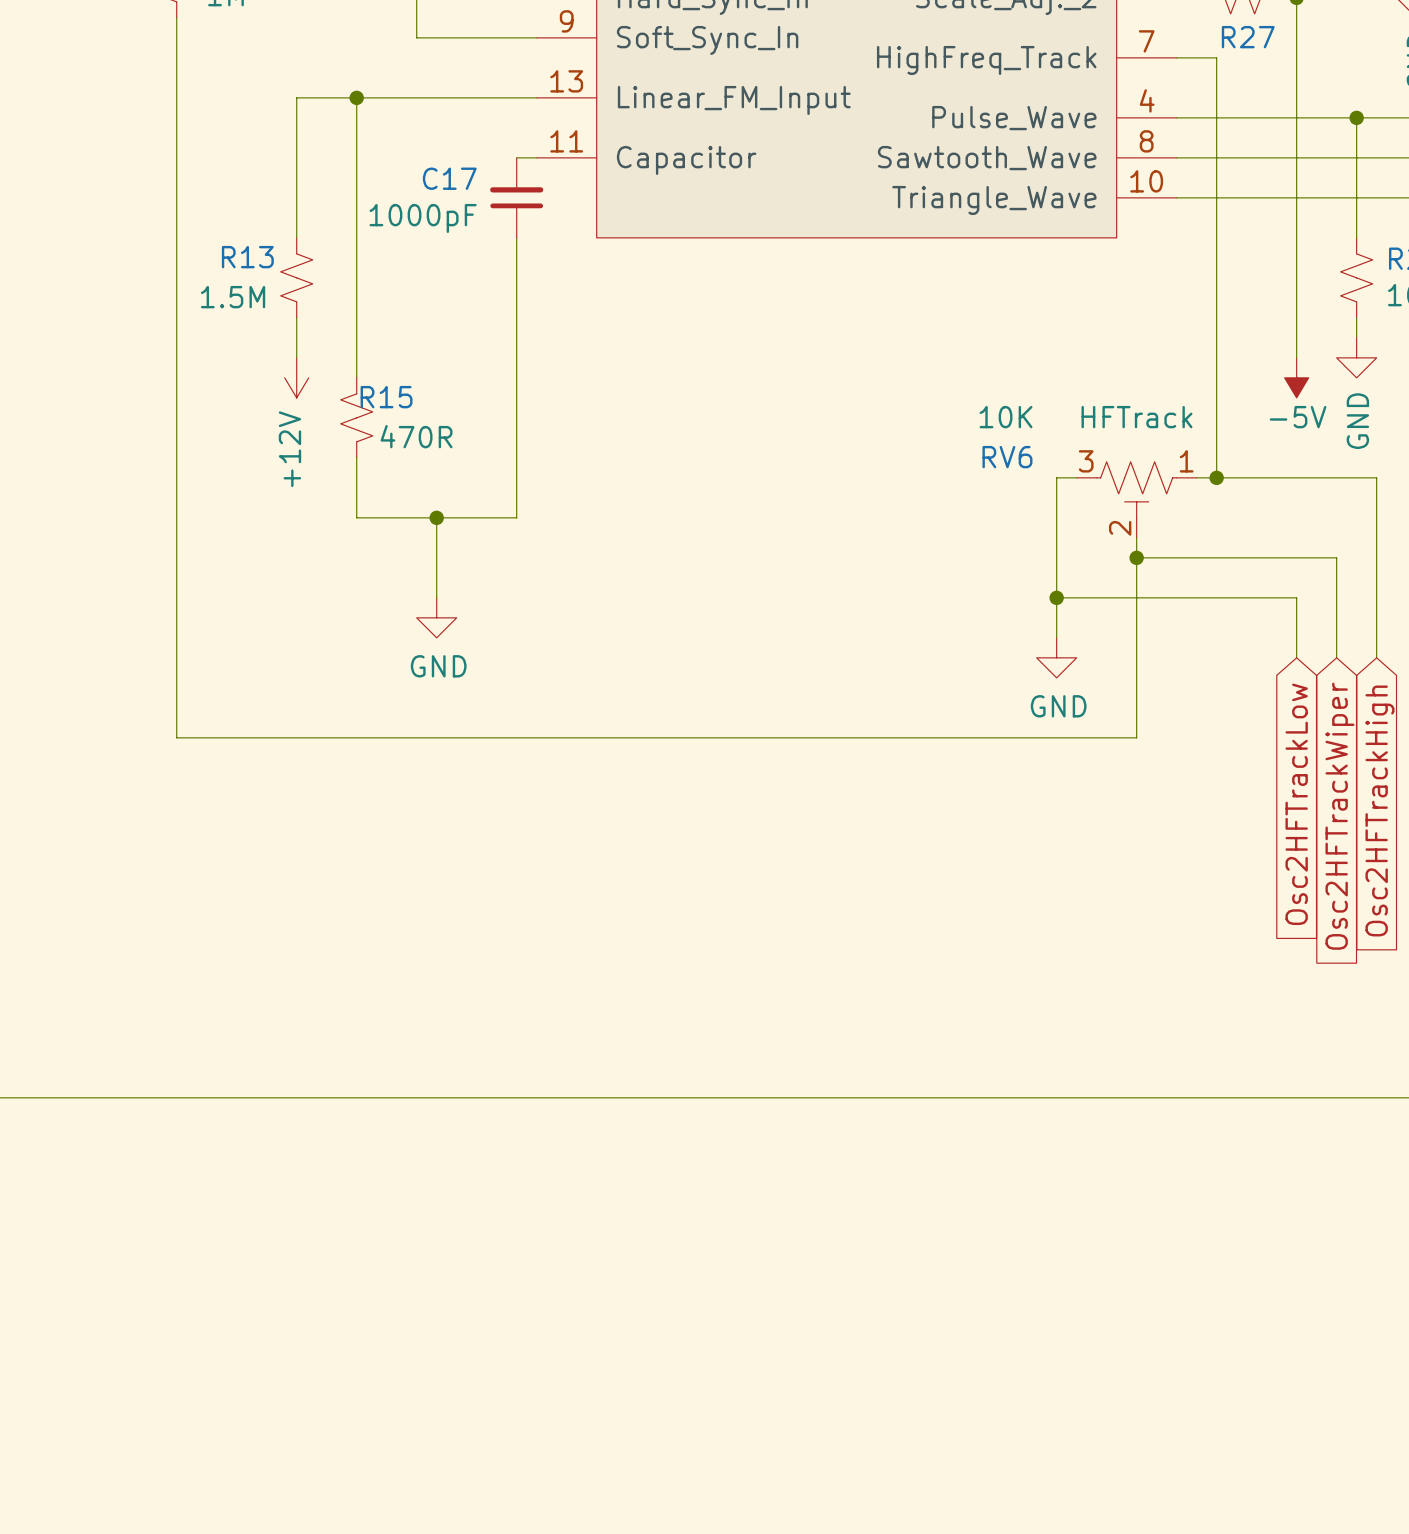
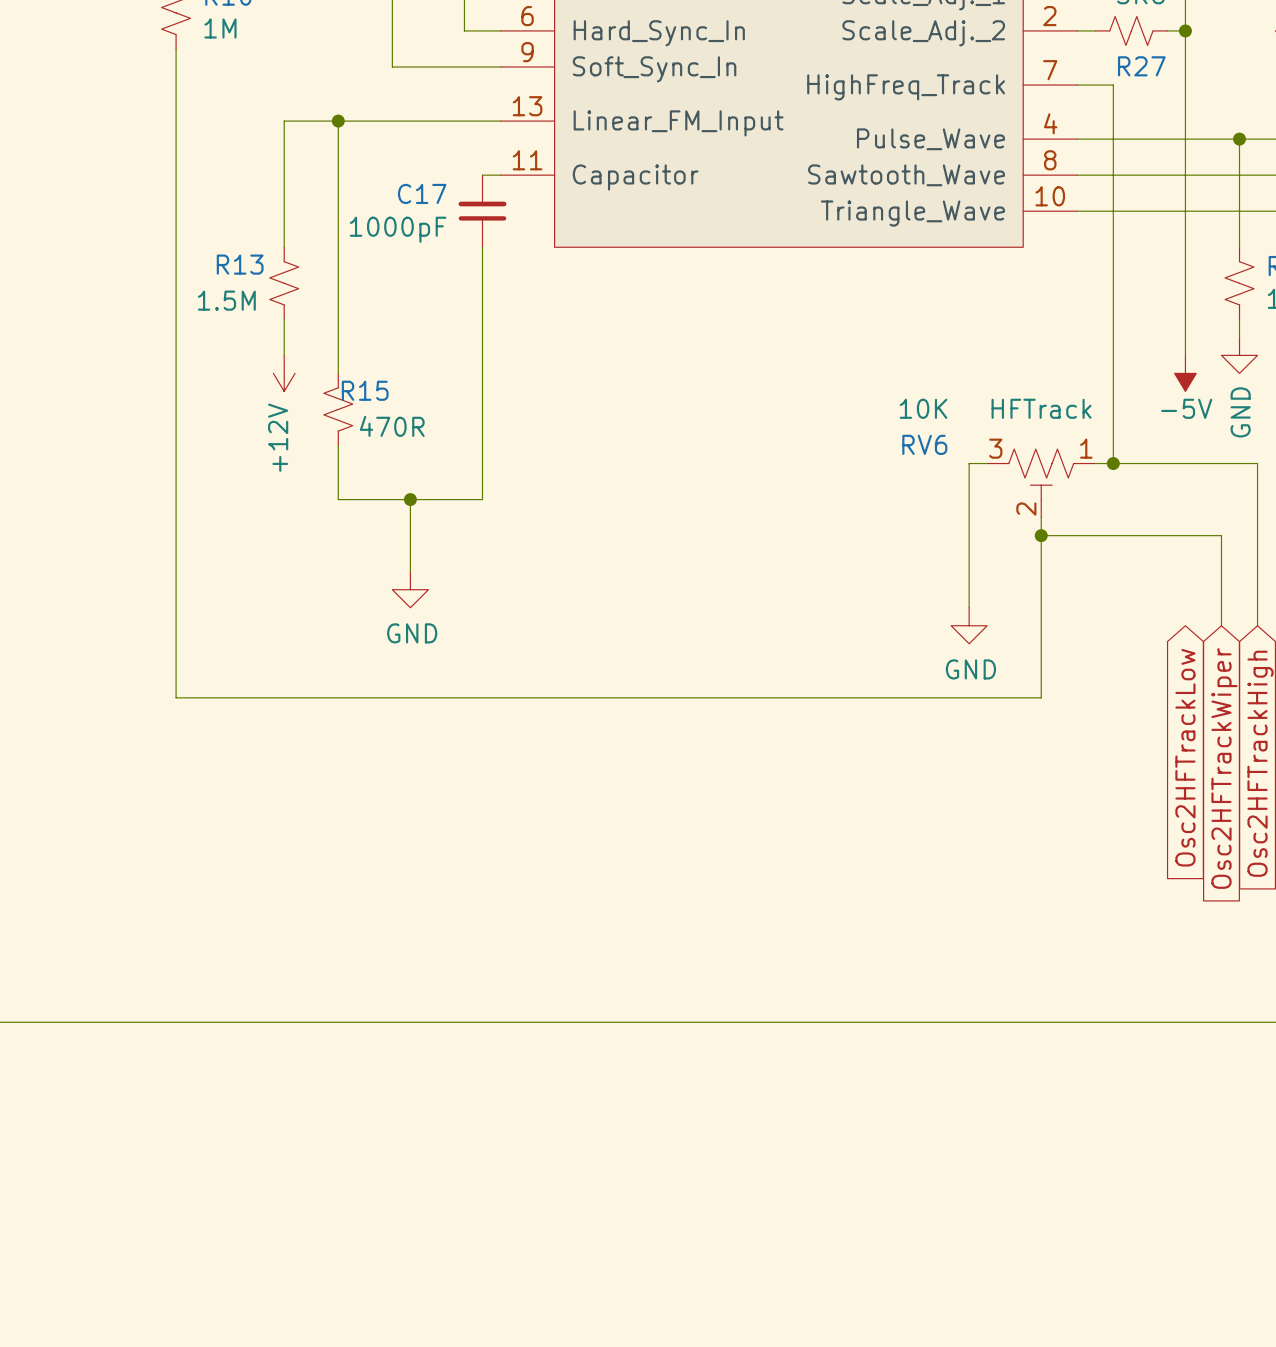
wire: (1056, 597) (1296, 597) (1296, 657) -> none
junction: (1056, 597) -> none

